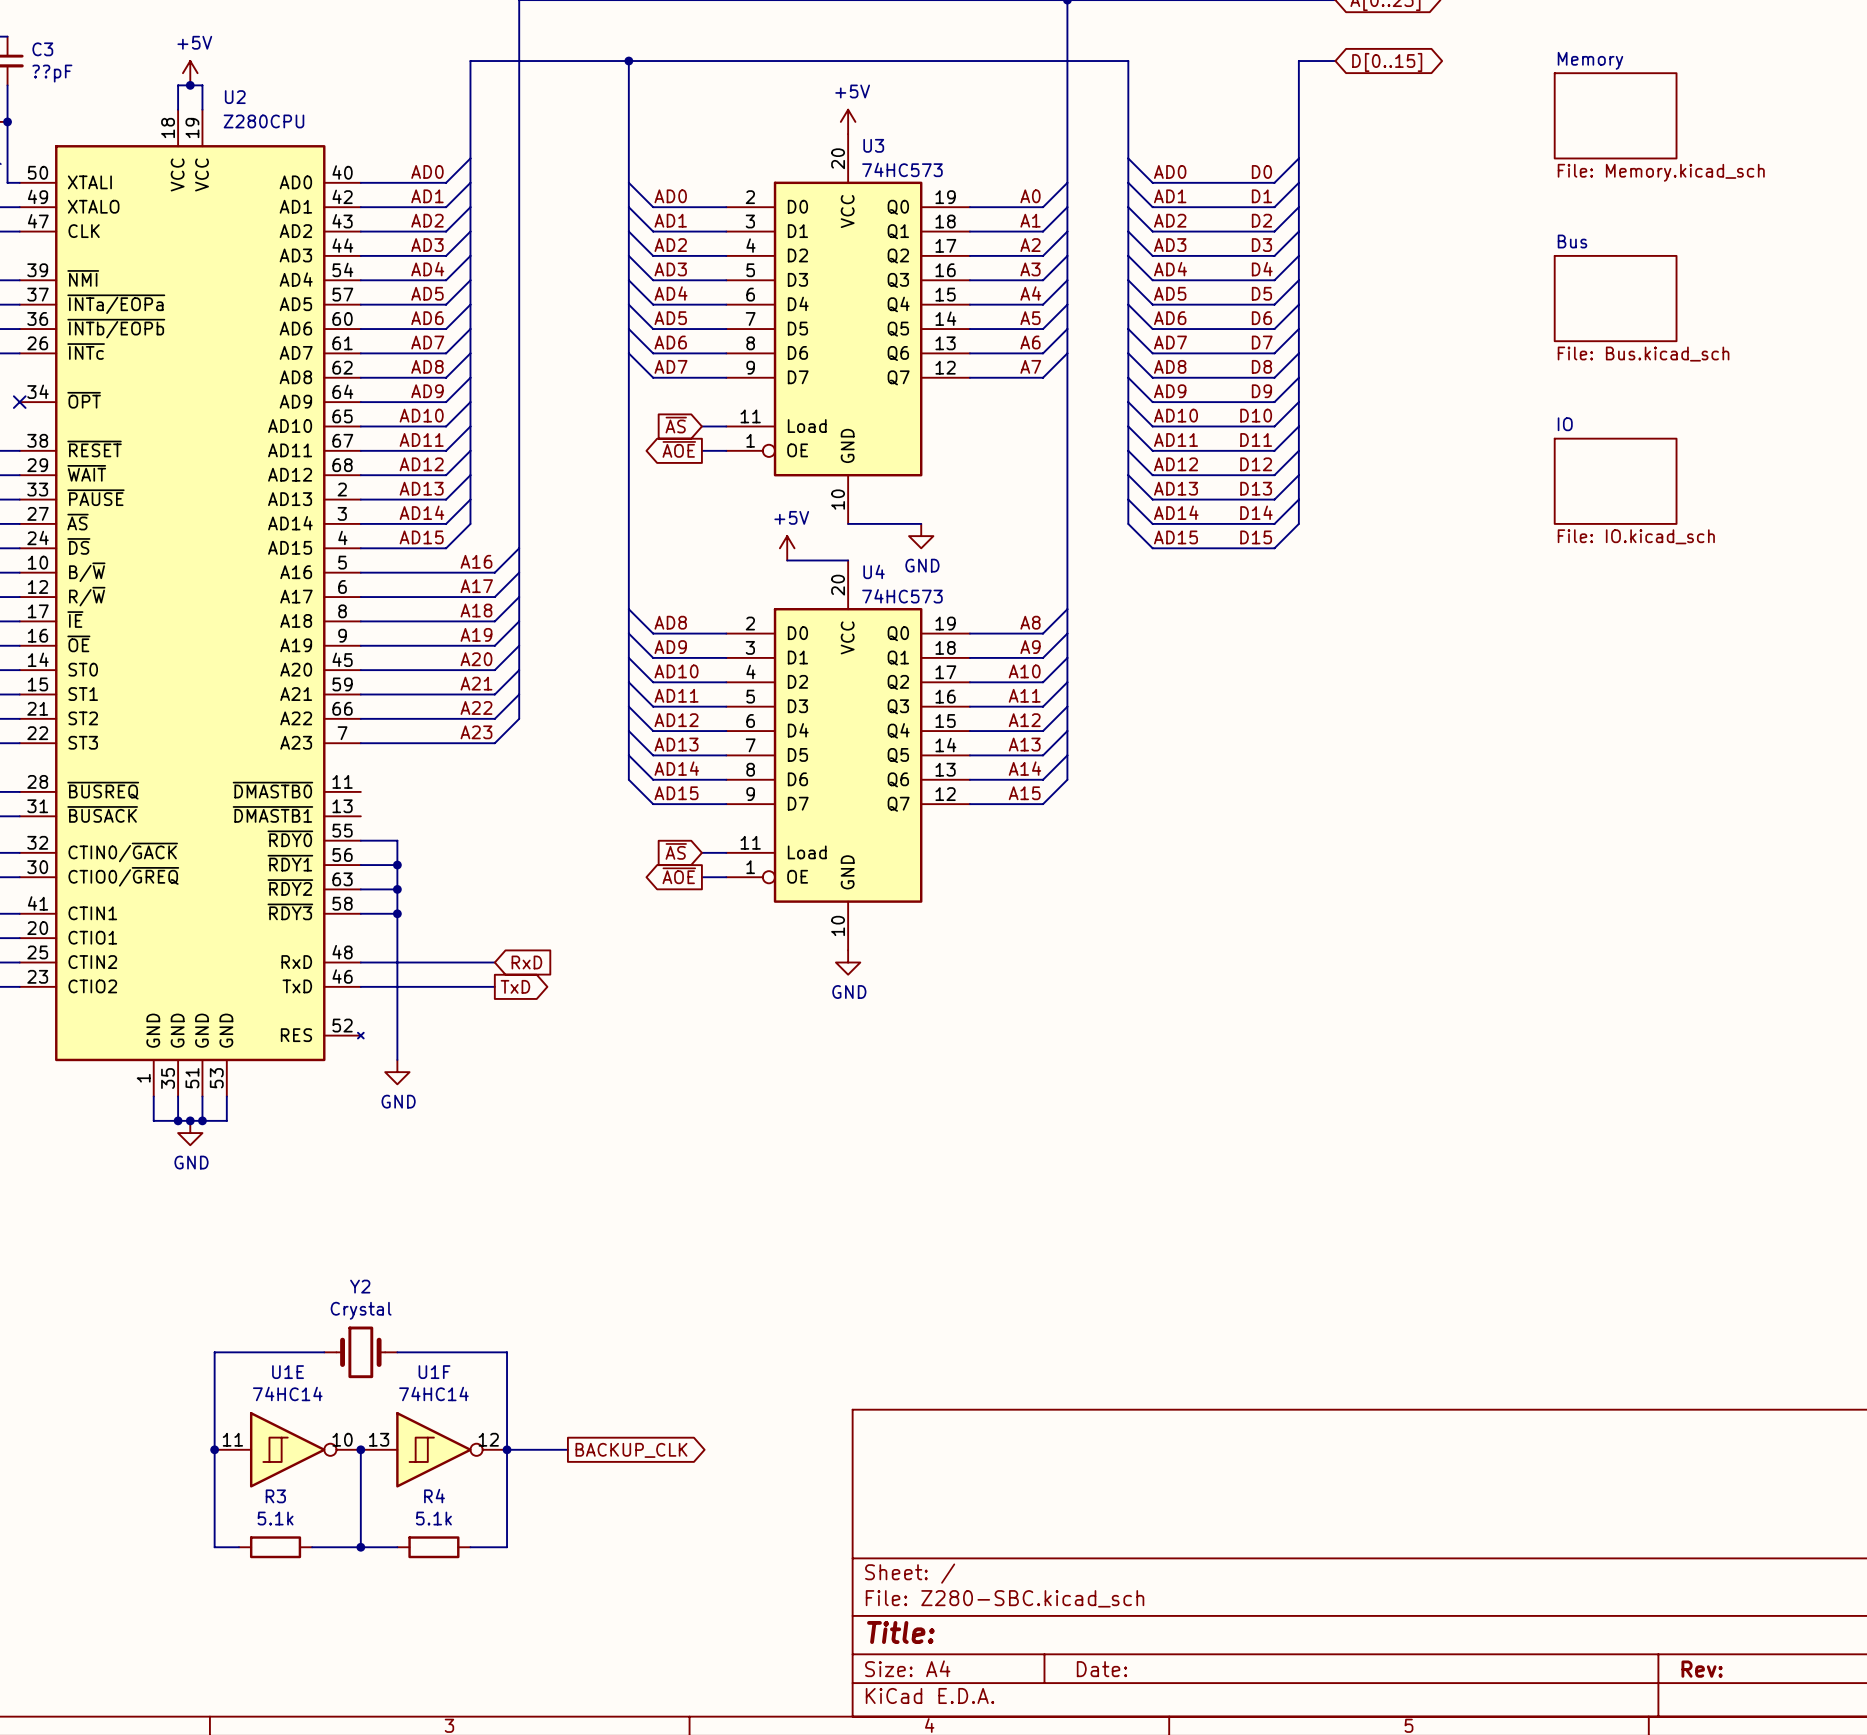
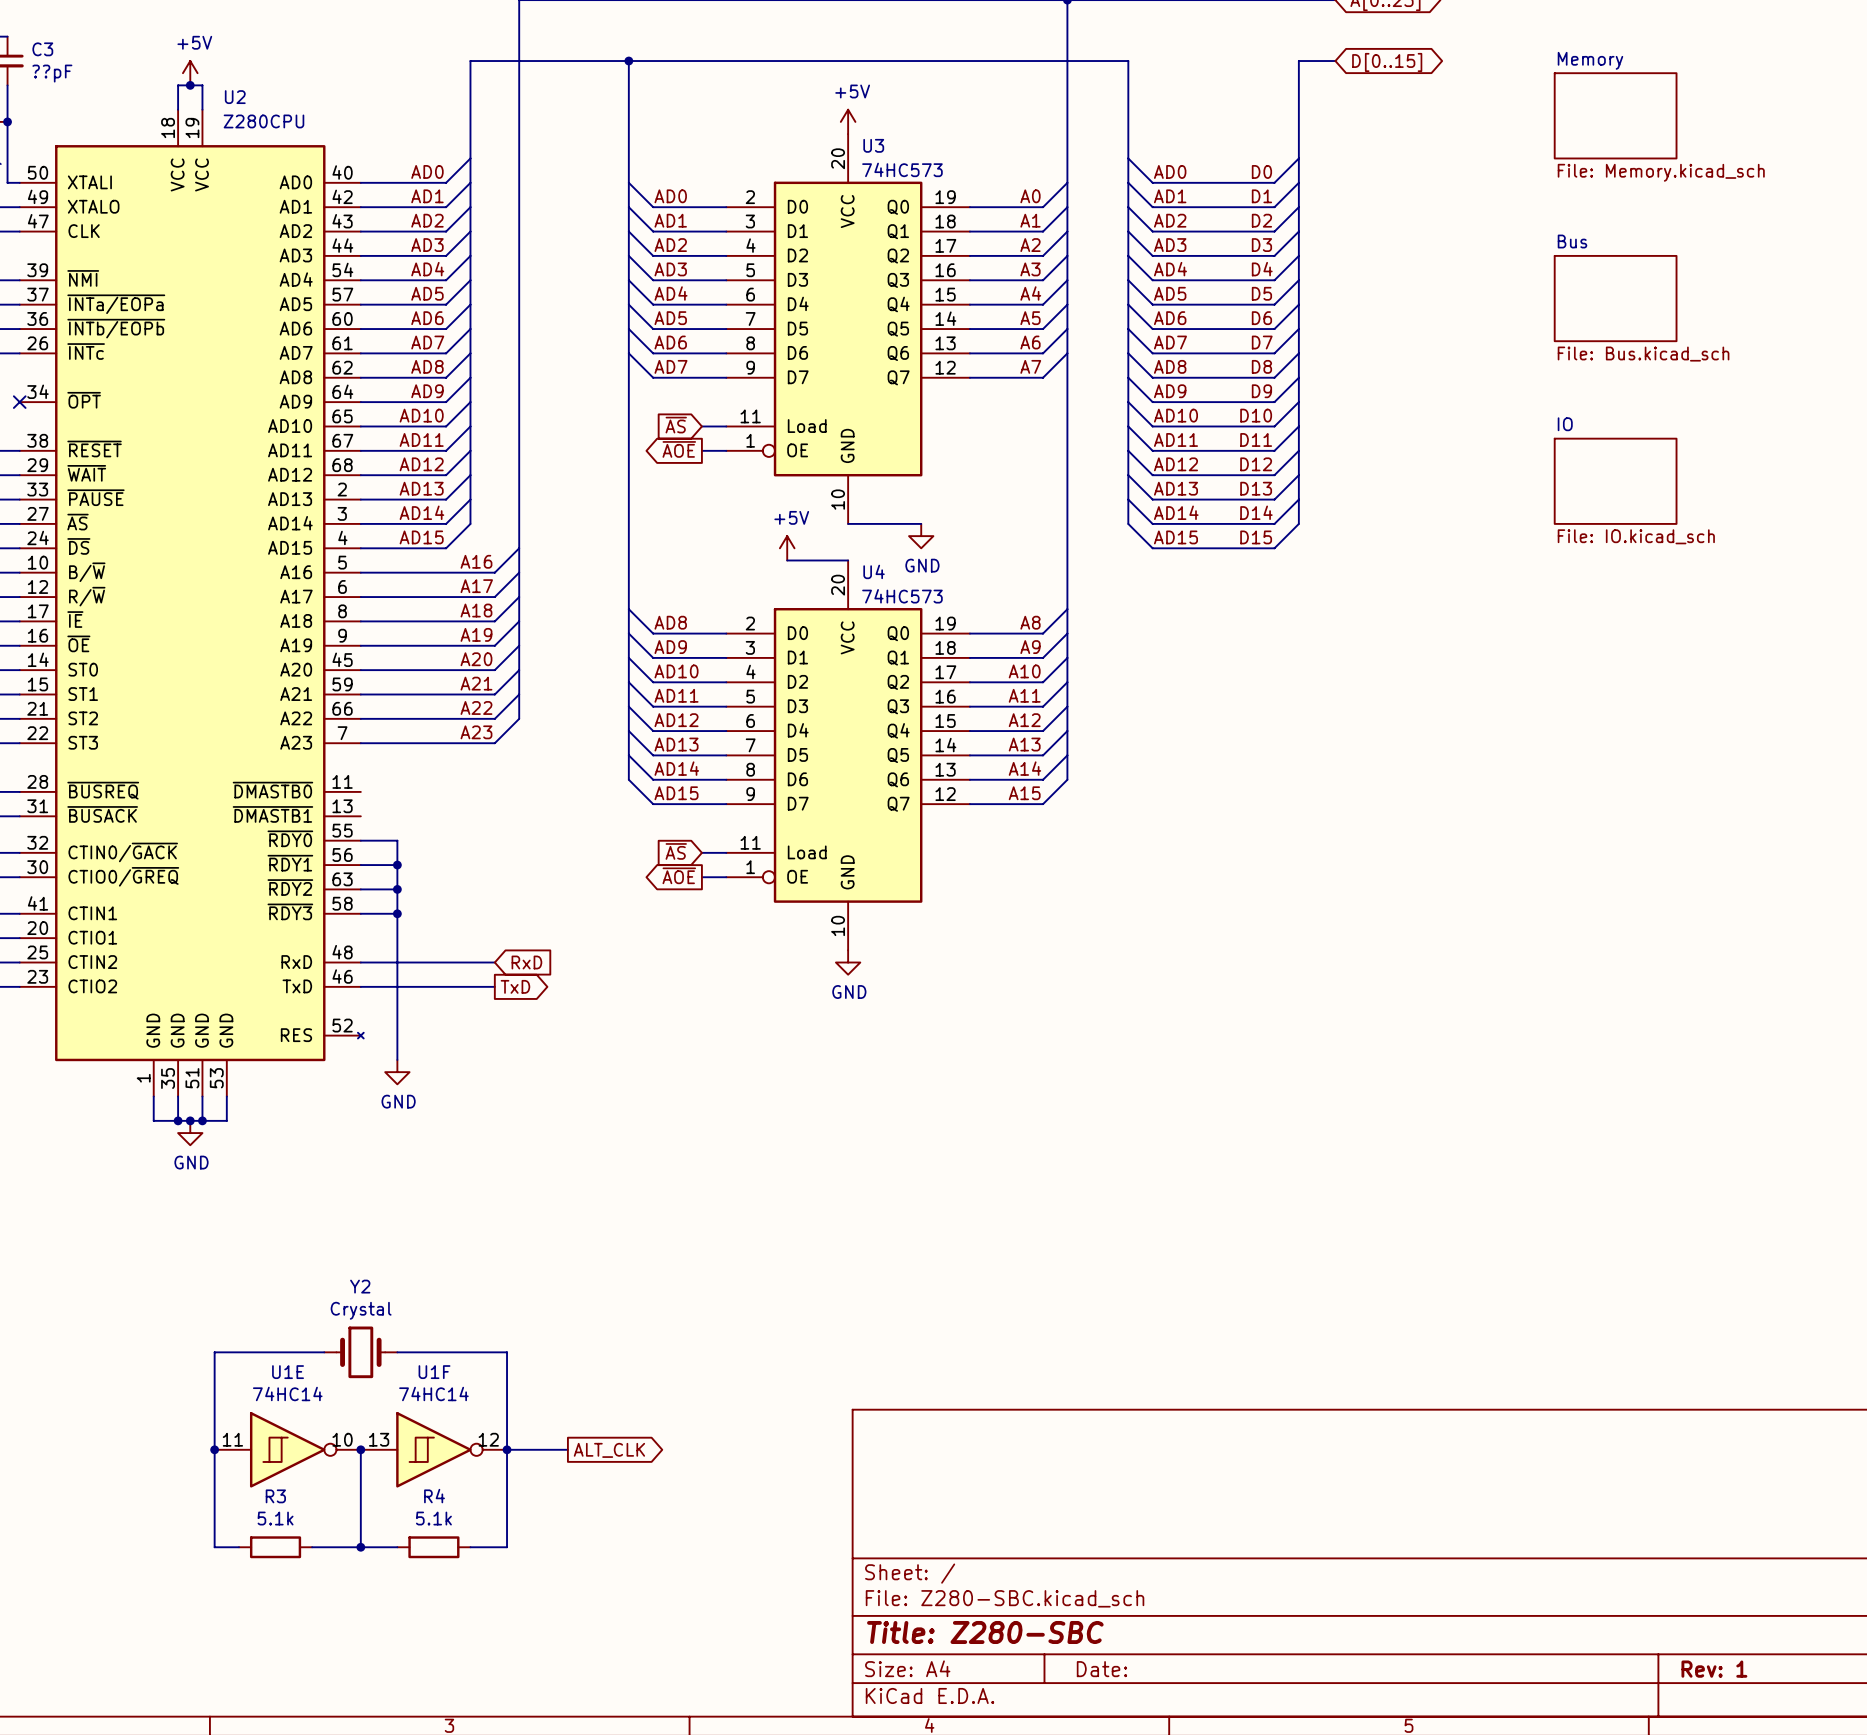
global label: BACKUP_CLK (631, 1450) -> ALT_CLK (609, 1450)
title block: Title: (900, 1632) -> Title: Z280-SBC (985, 1632)
title block: Rev: (1702, 1669) -> Rev: 1 (1714, 1669)

